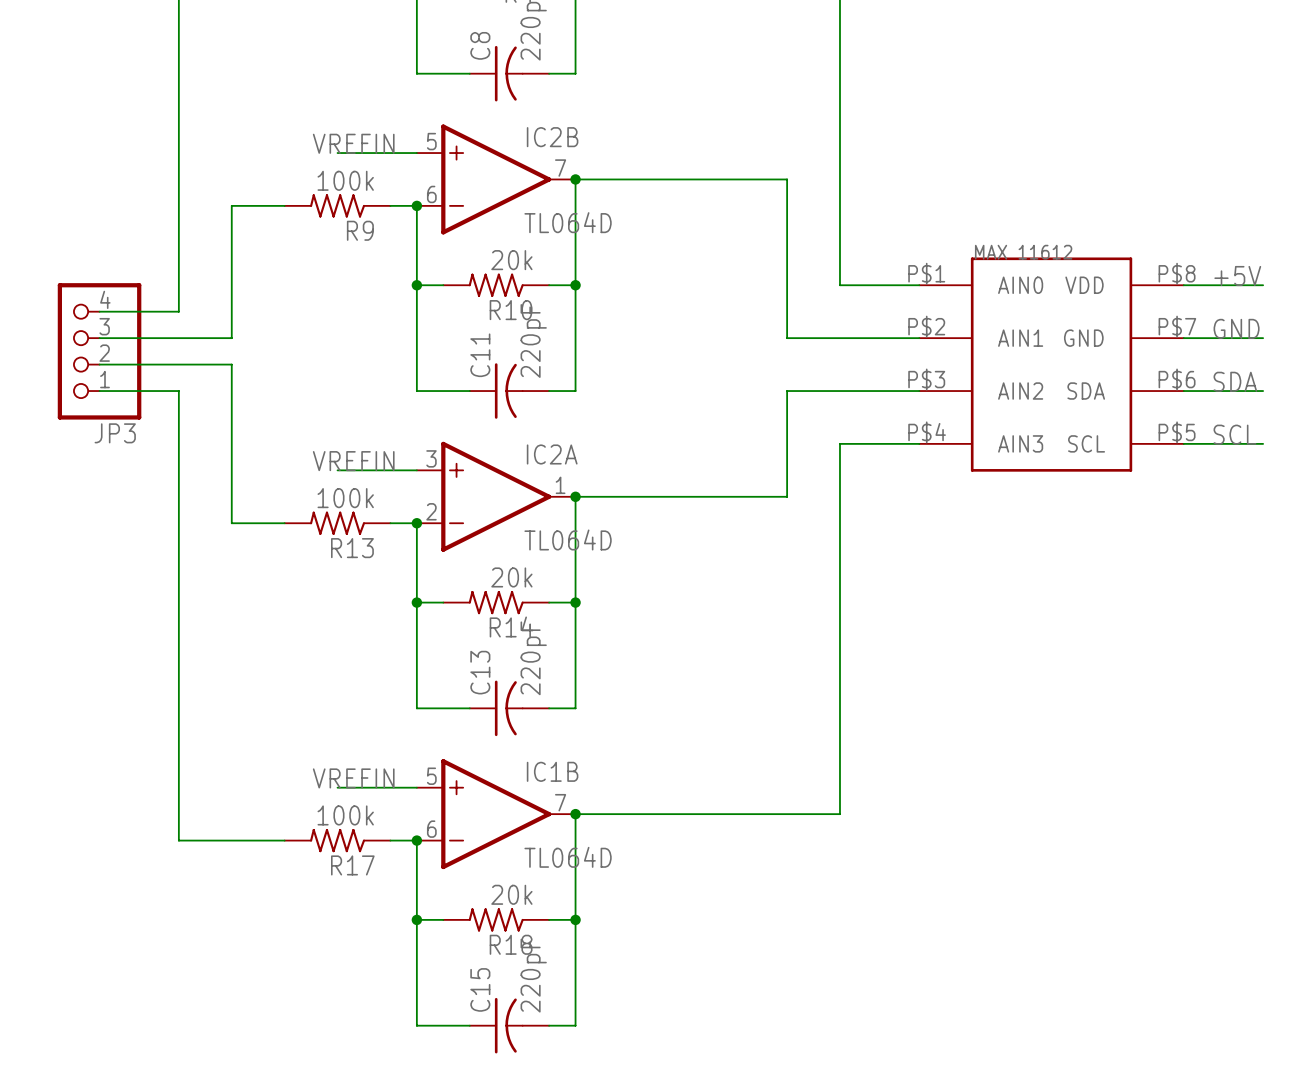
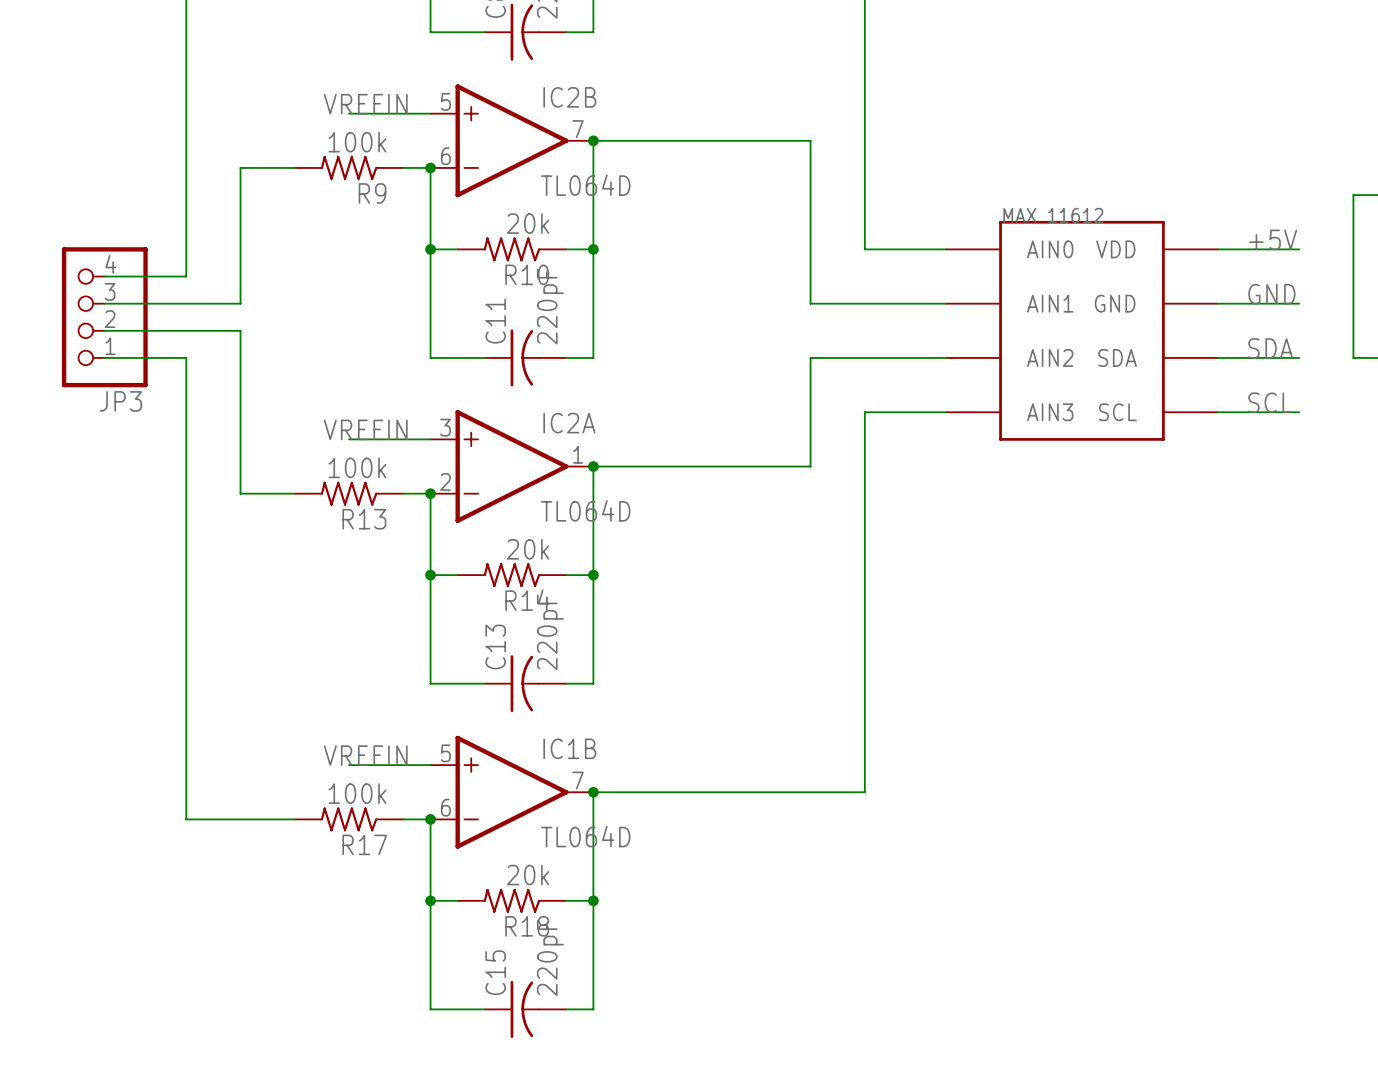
part pin number: P$1 (926, 273) -> none
part pin number: P$8 (1177, 273) -> none
part pin number: P$2 (926, 326) -> none
part pin number: P$7 (1177, 326) -> none
part pin number: P$3 (926, 379) -> none
part pin number: P$6 (1177, 379) -> none
part pin number: P$4 (927, 432) -> none
part pin number: P$5 (1177, 432) -> none

